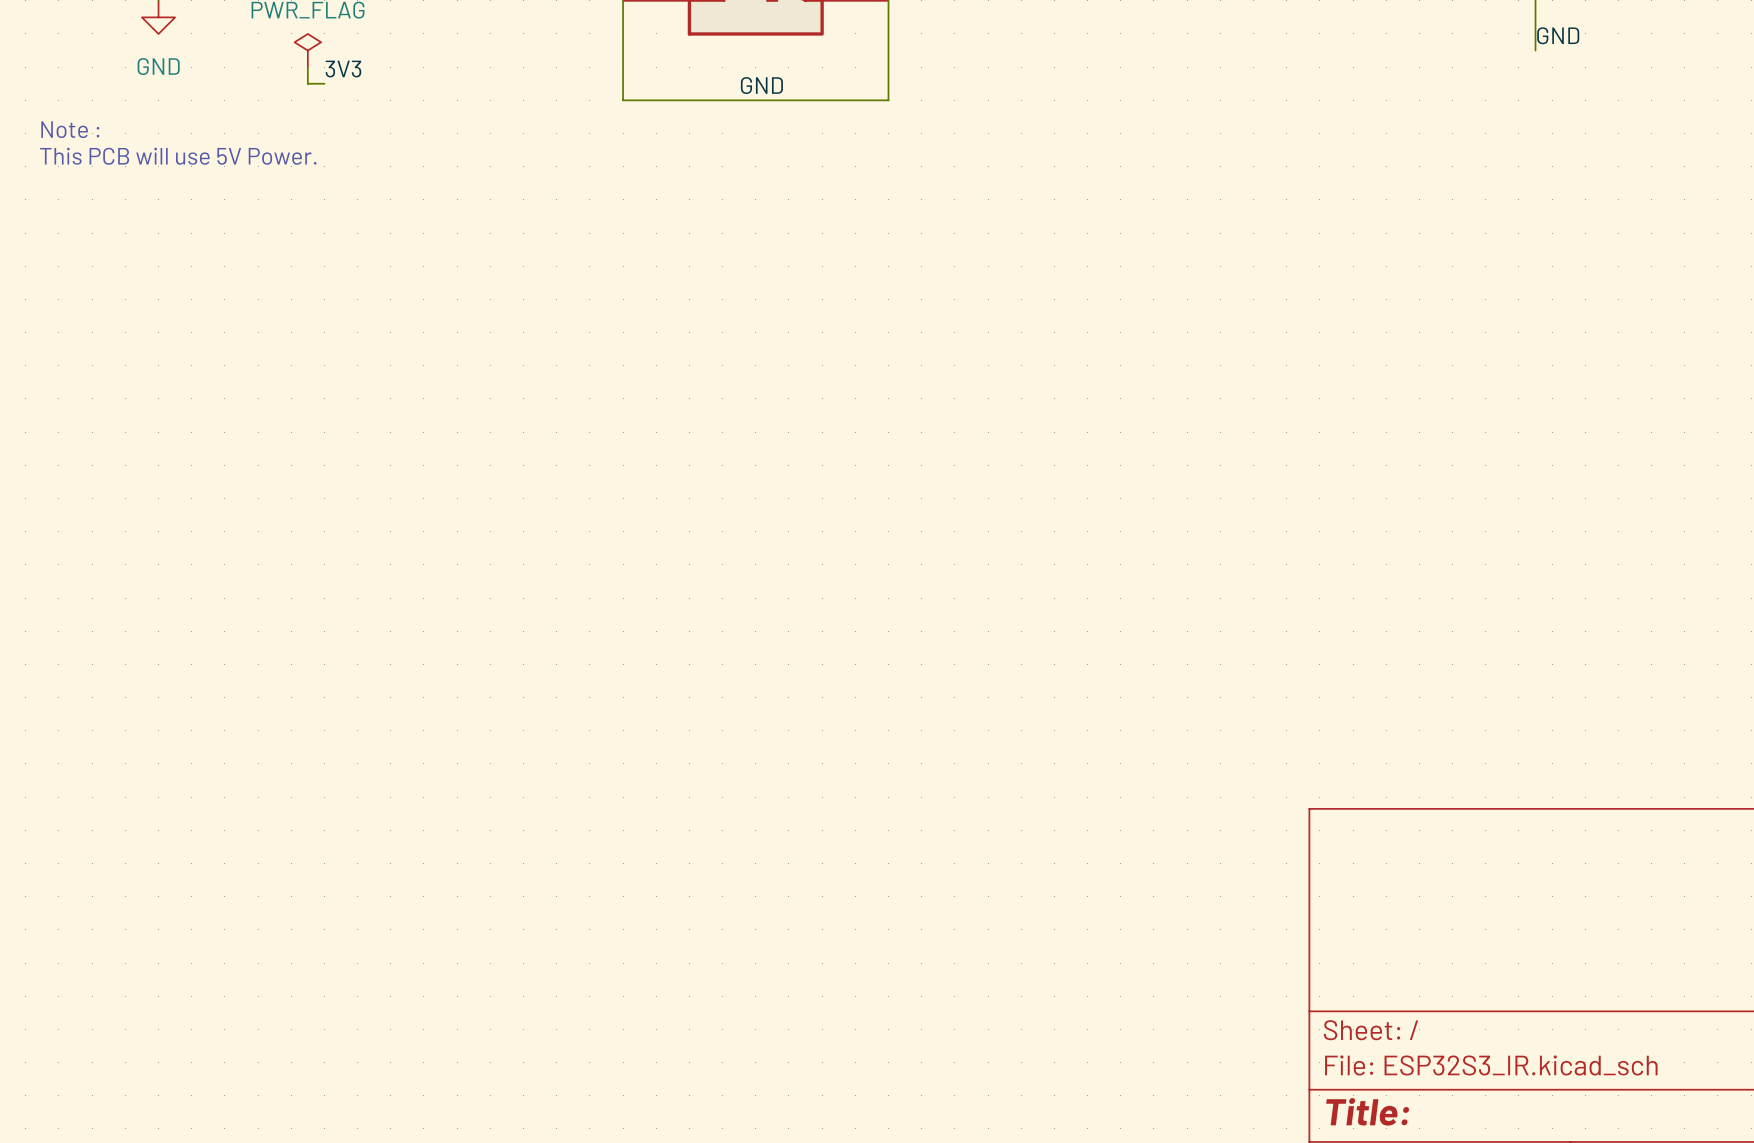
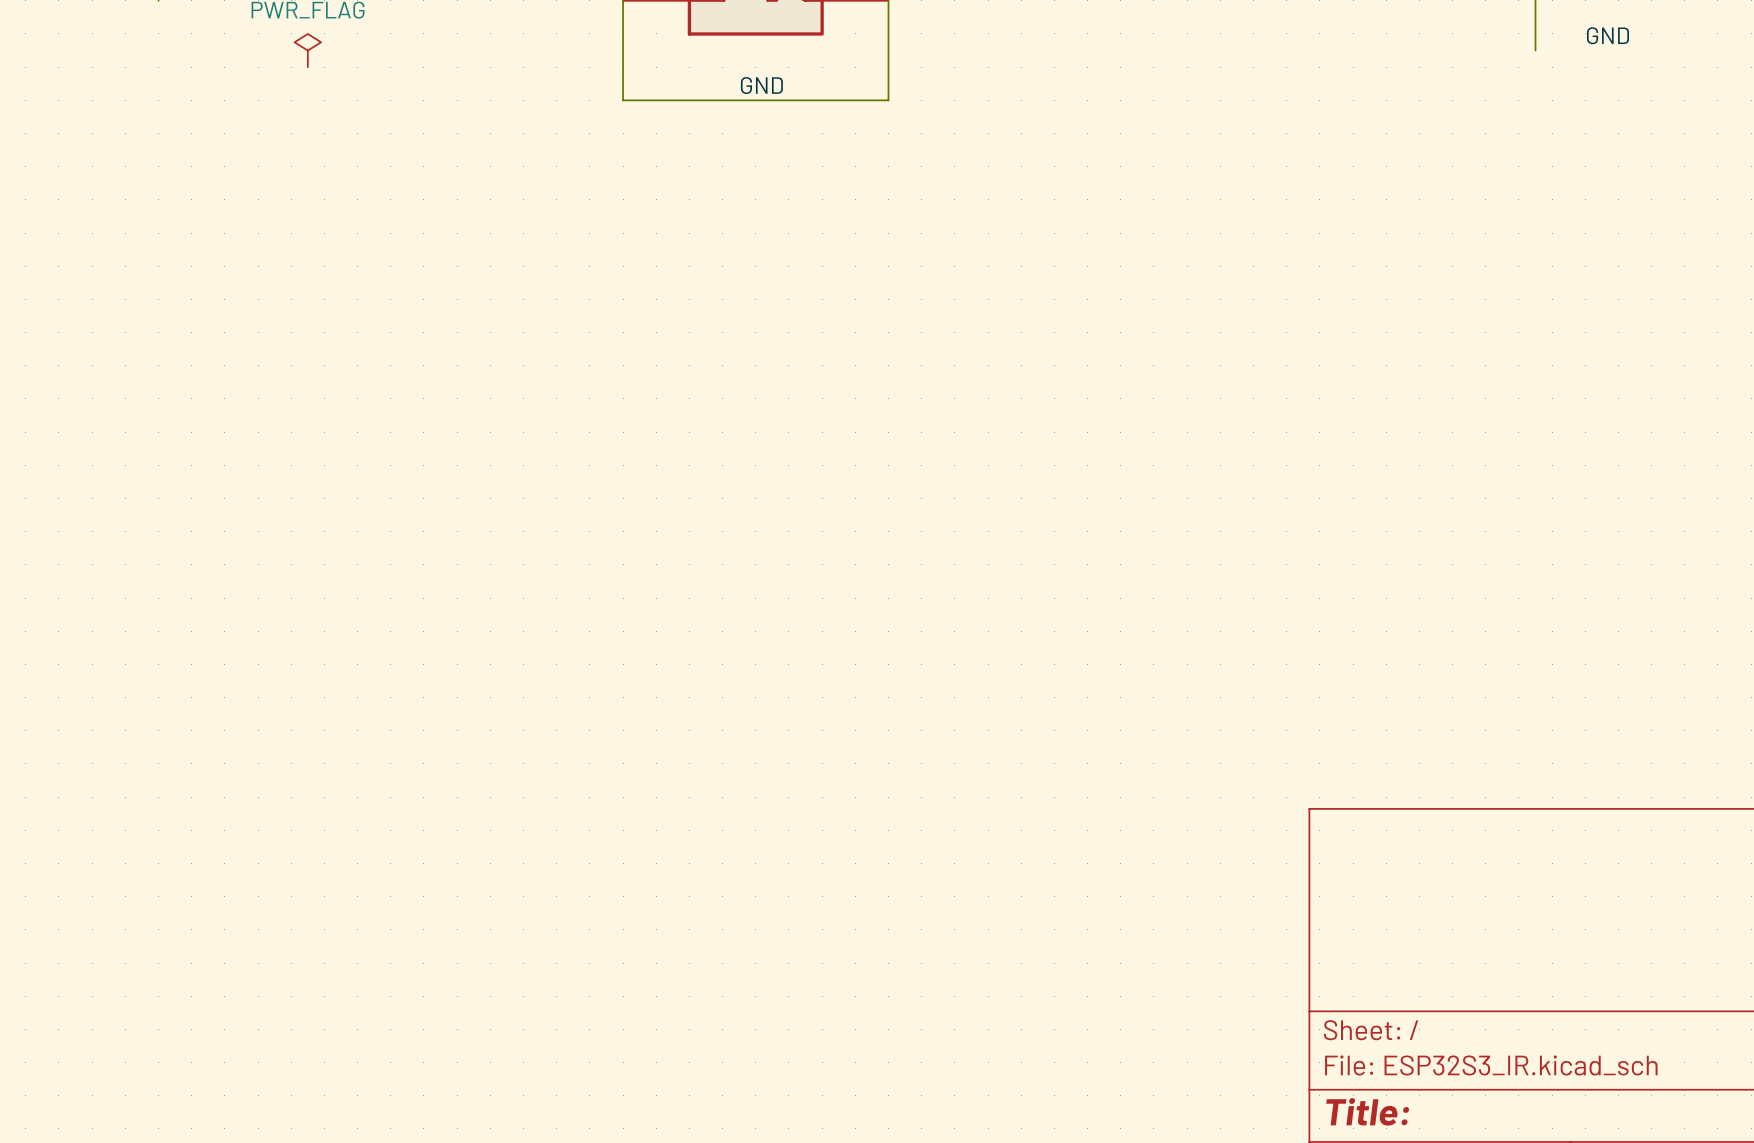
power symbol: GND (158, 17) -> none
label position: GND (1558, 35) -> GND (1607, 35)
wire: (307, 67) (307, 83) (324, 83) -> none
label: 3V3 (343, 69) -> none
text: Note : (70, 129) -> none
text: This PCB will use 5V Power. (178, 156) -> none

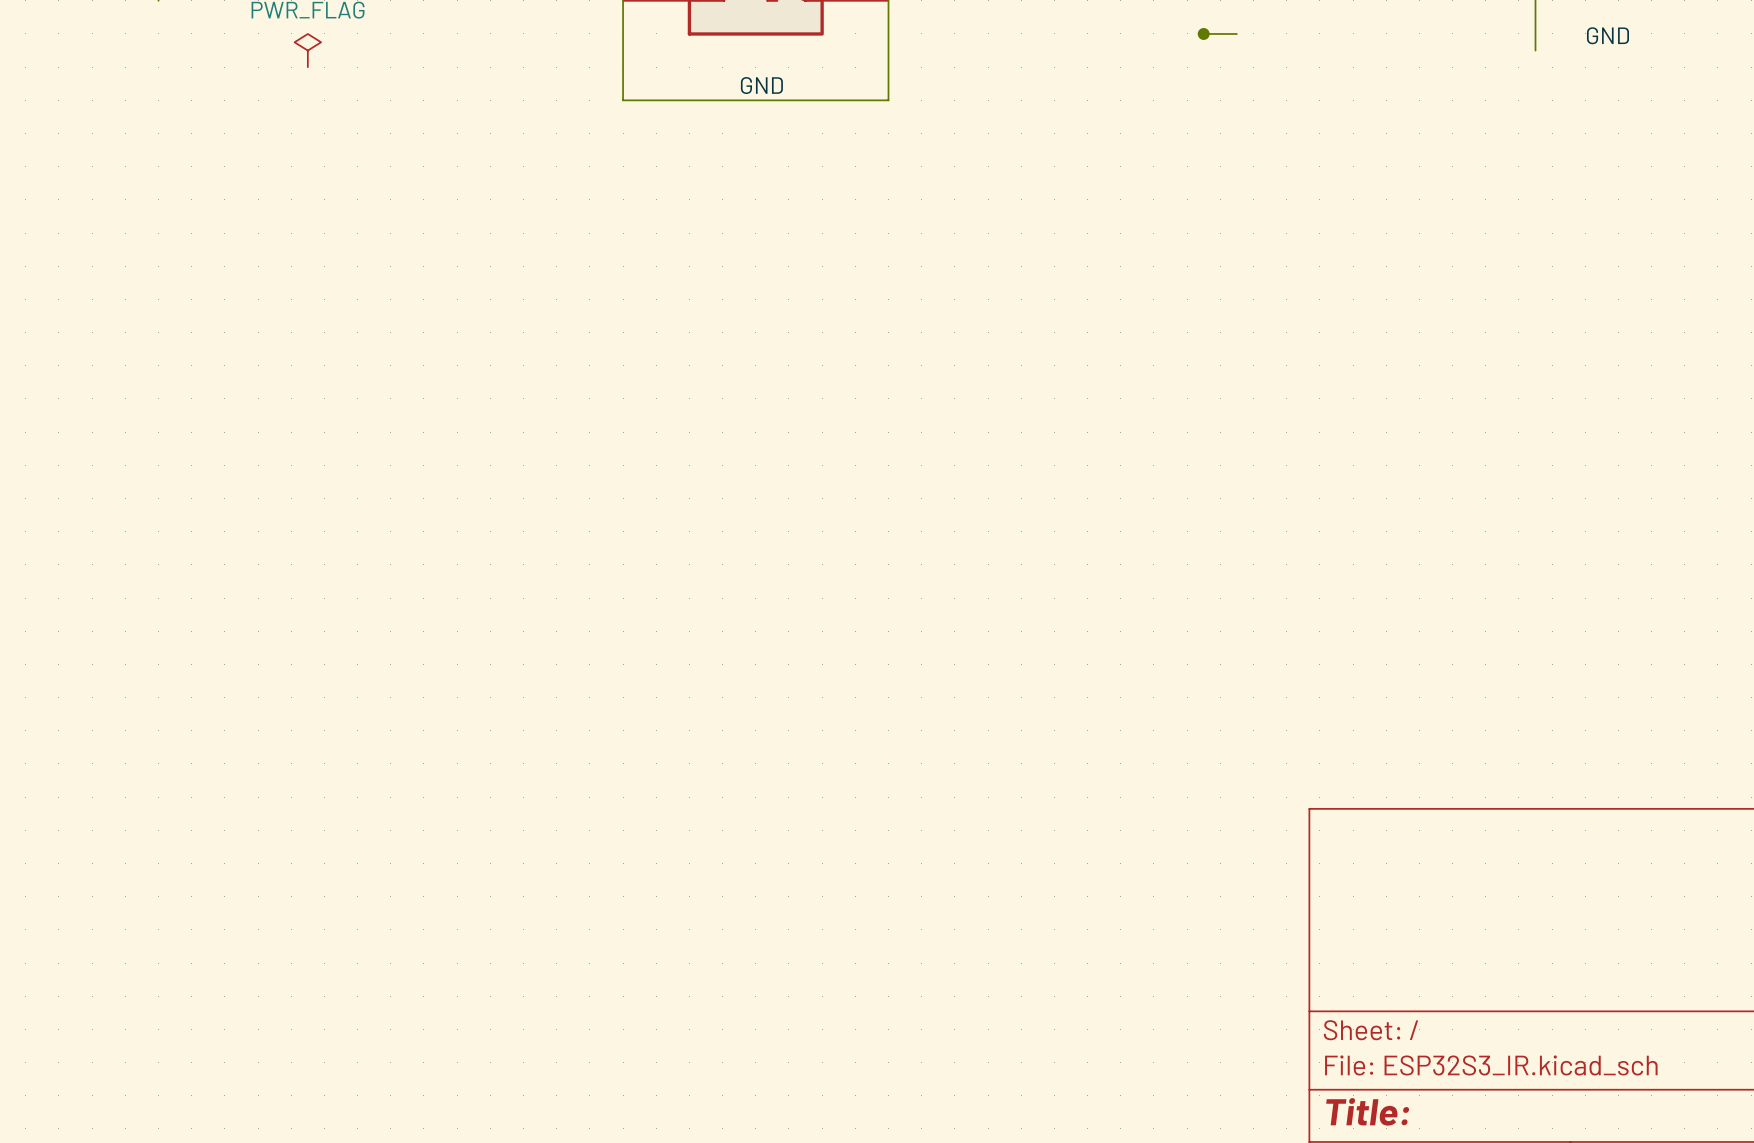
wire: none -> (1203, 33) (1236, 33)
junction: none -> (1203, 33)

